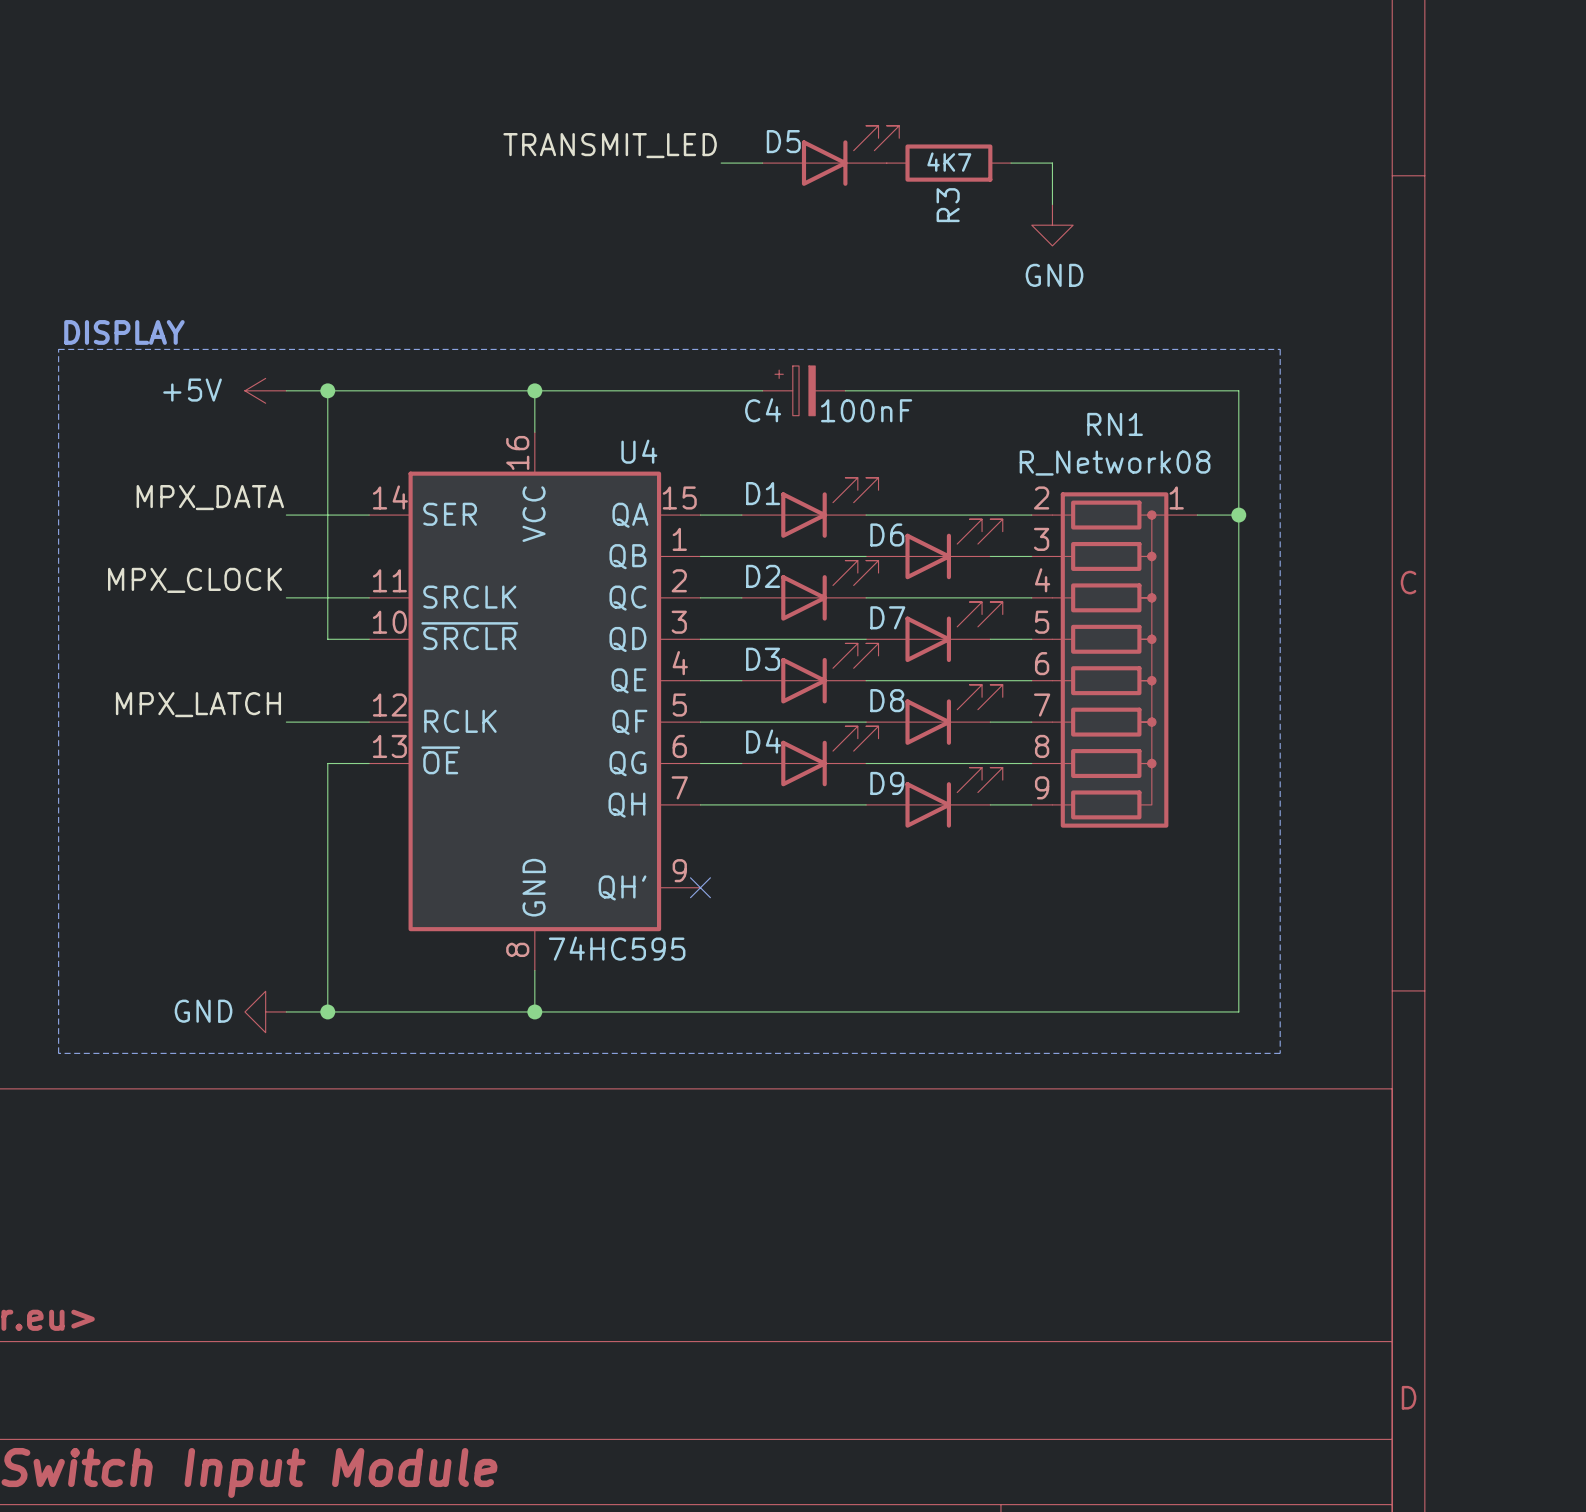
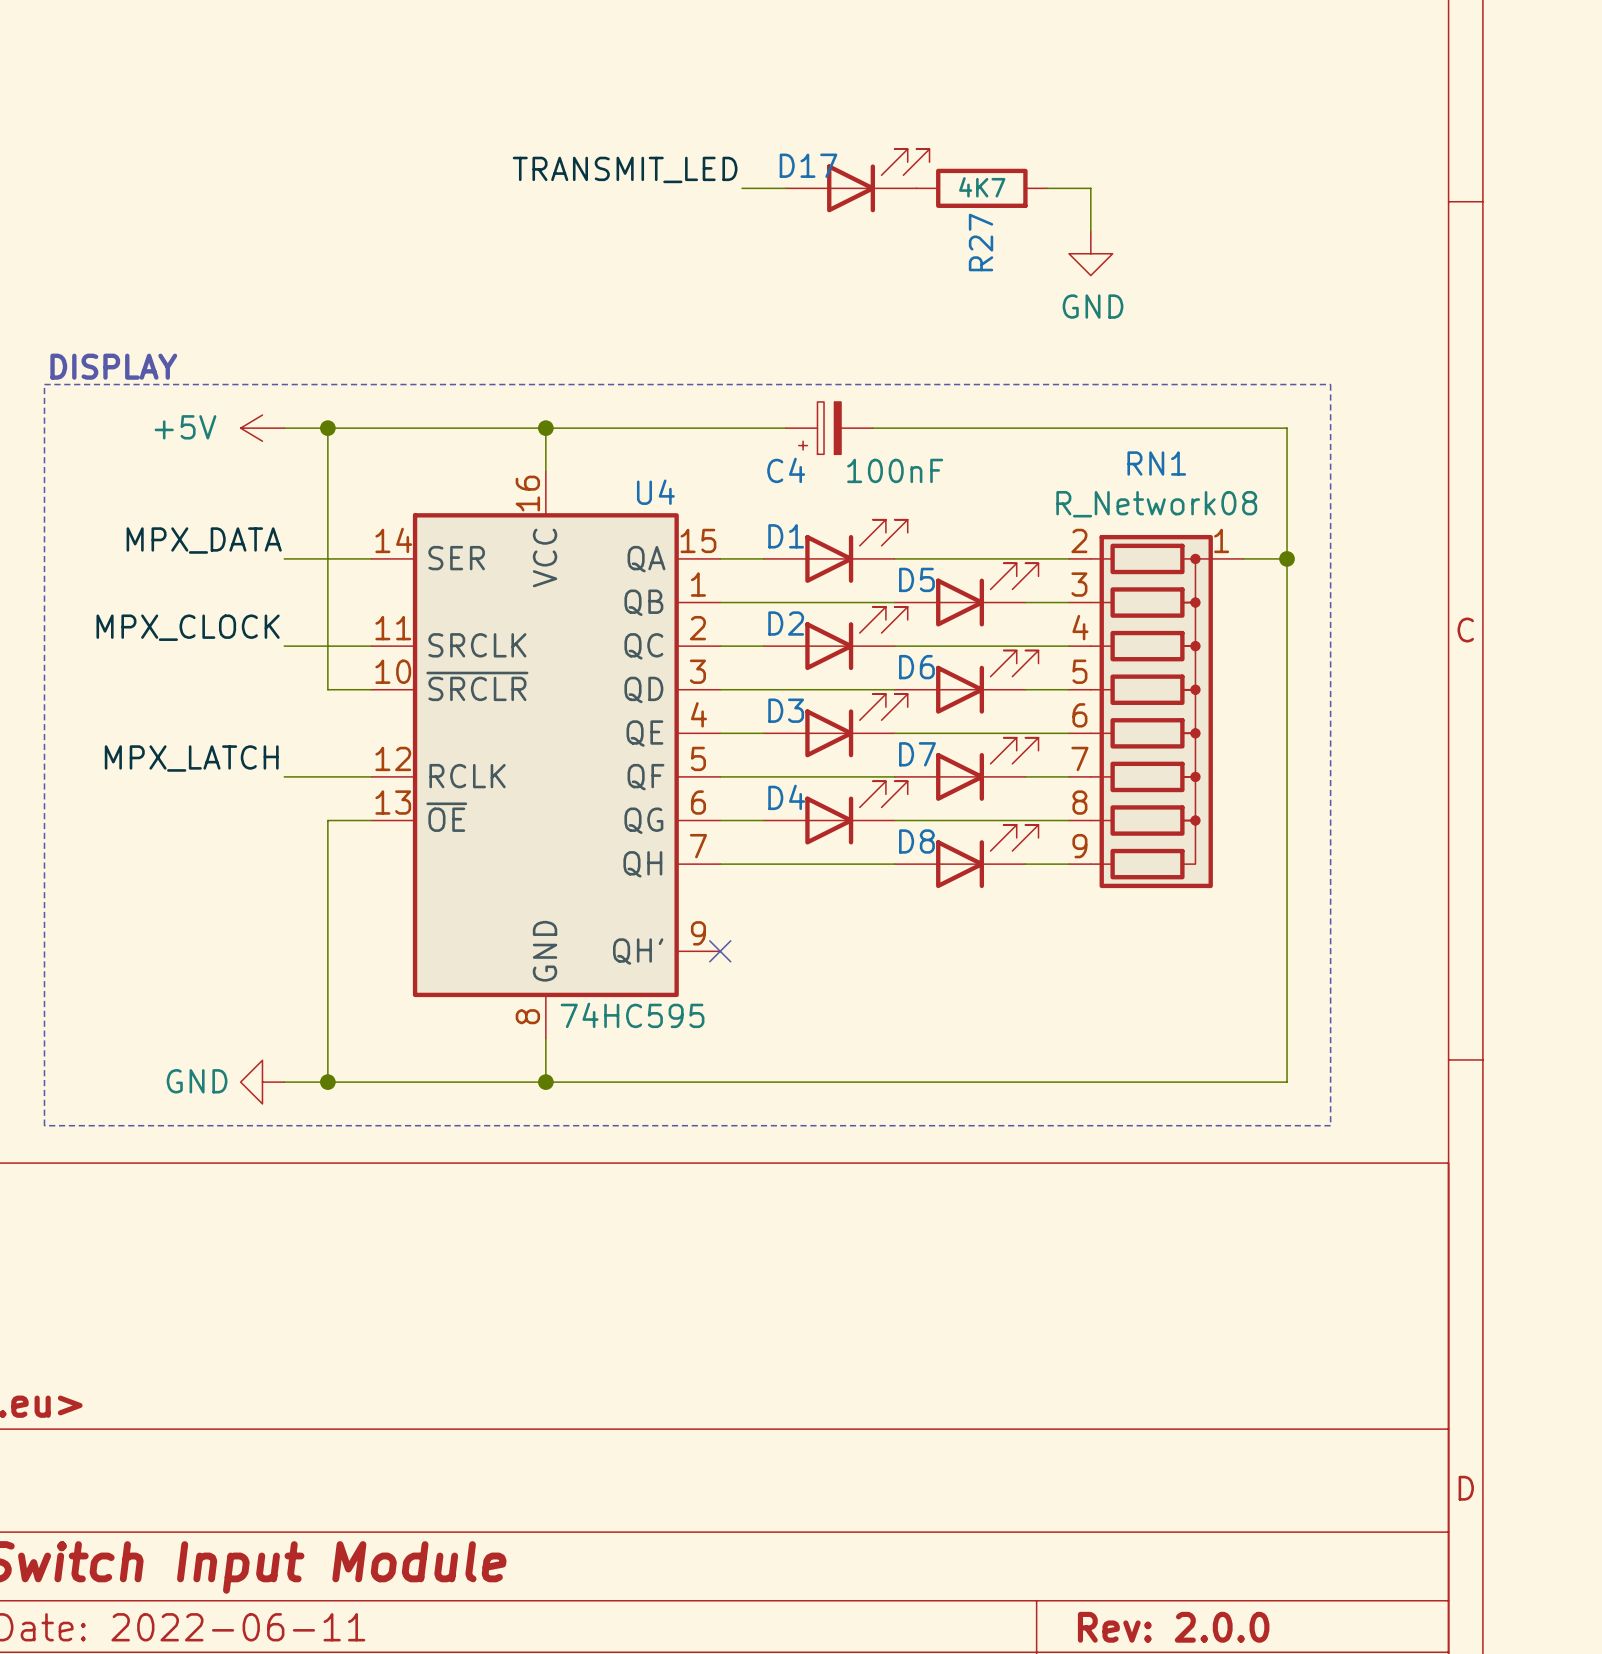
D5 name: D5 (783, 141) -> D17 (808, 165)
R3 name: R3 (948, 205) -> R27 (981, 242)
C4 flip: as is (795, 390) -> up-down (819, 428)
D6 name: D6 (887, 534) -> D5 (916, 579)
D7 name: D7 (887, 617) -> D6 (916, 667)
D8 name: D8 (887, 700) -> D7 (917, 754)
D9 name: D9 (887, 783) -> D8 (916, 841)

